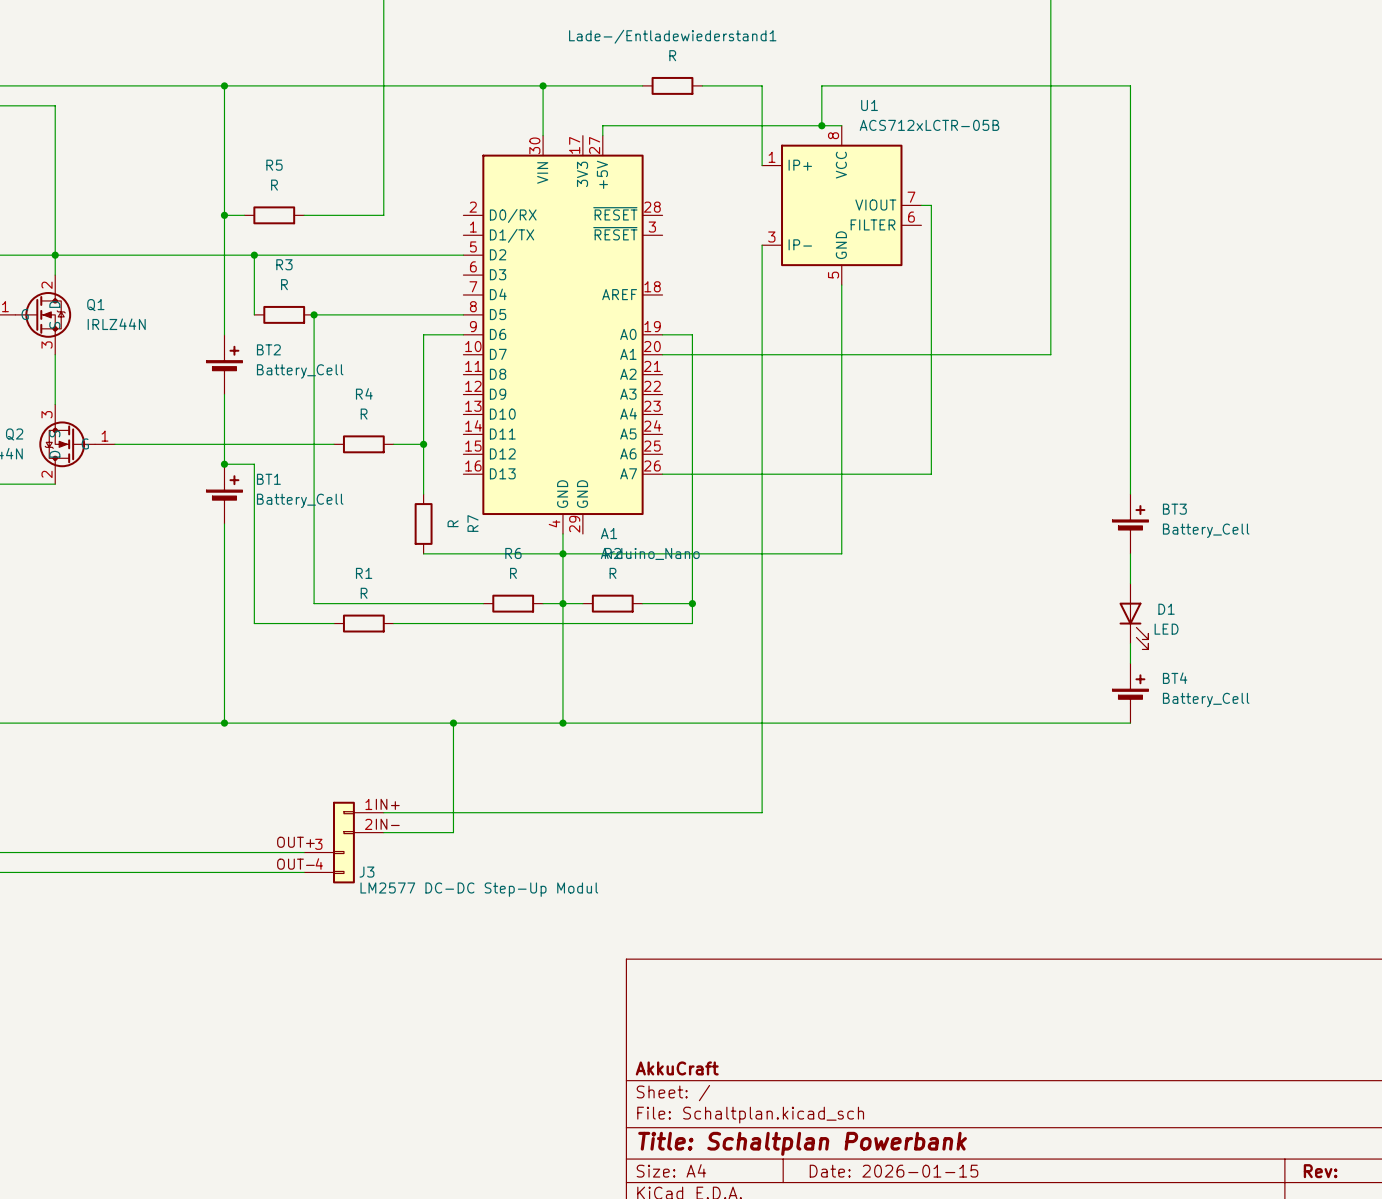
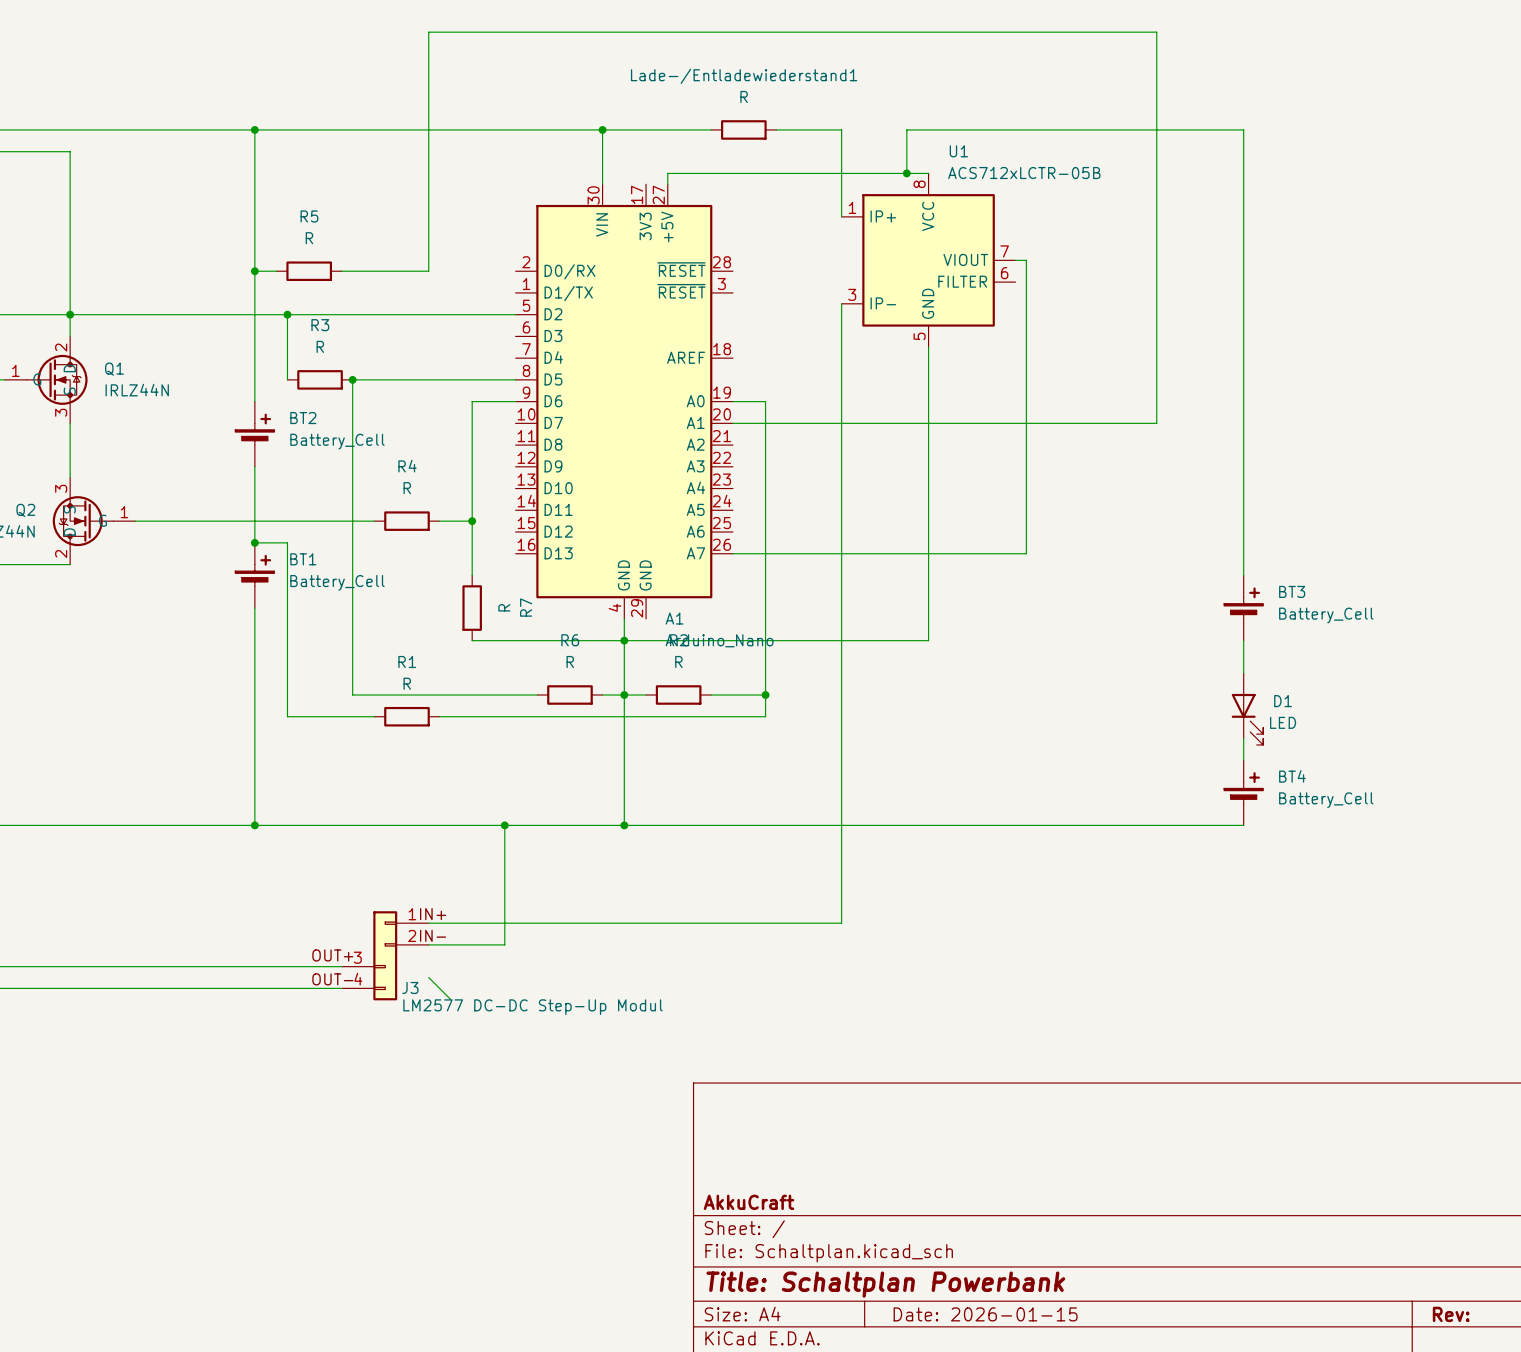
wire: none -> (428, 977) (450, 999)

